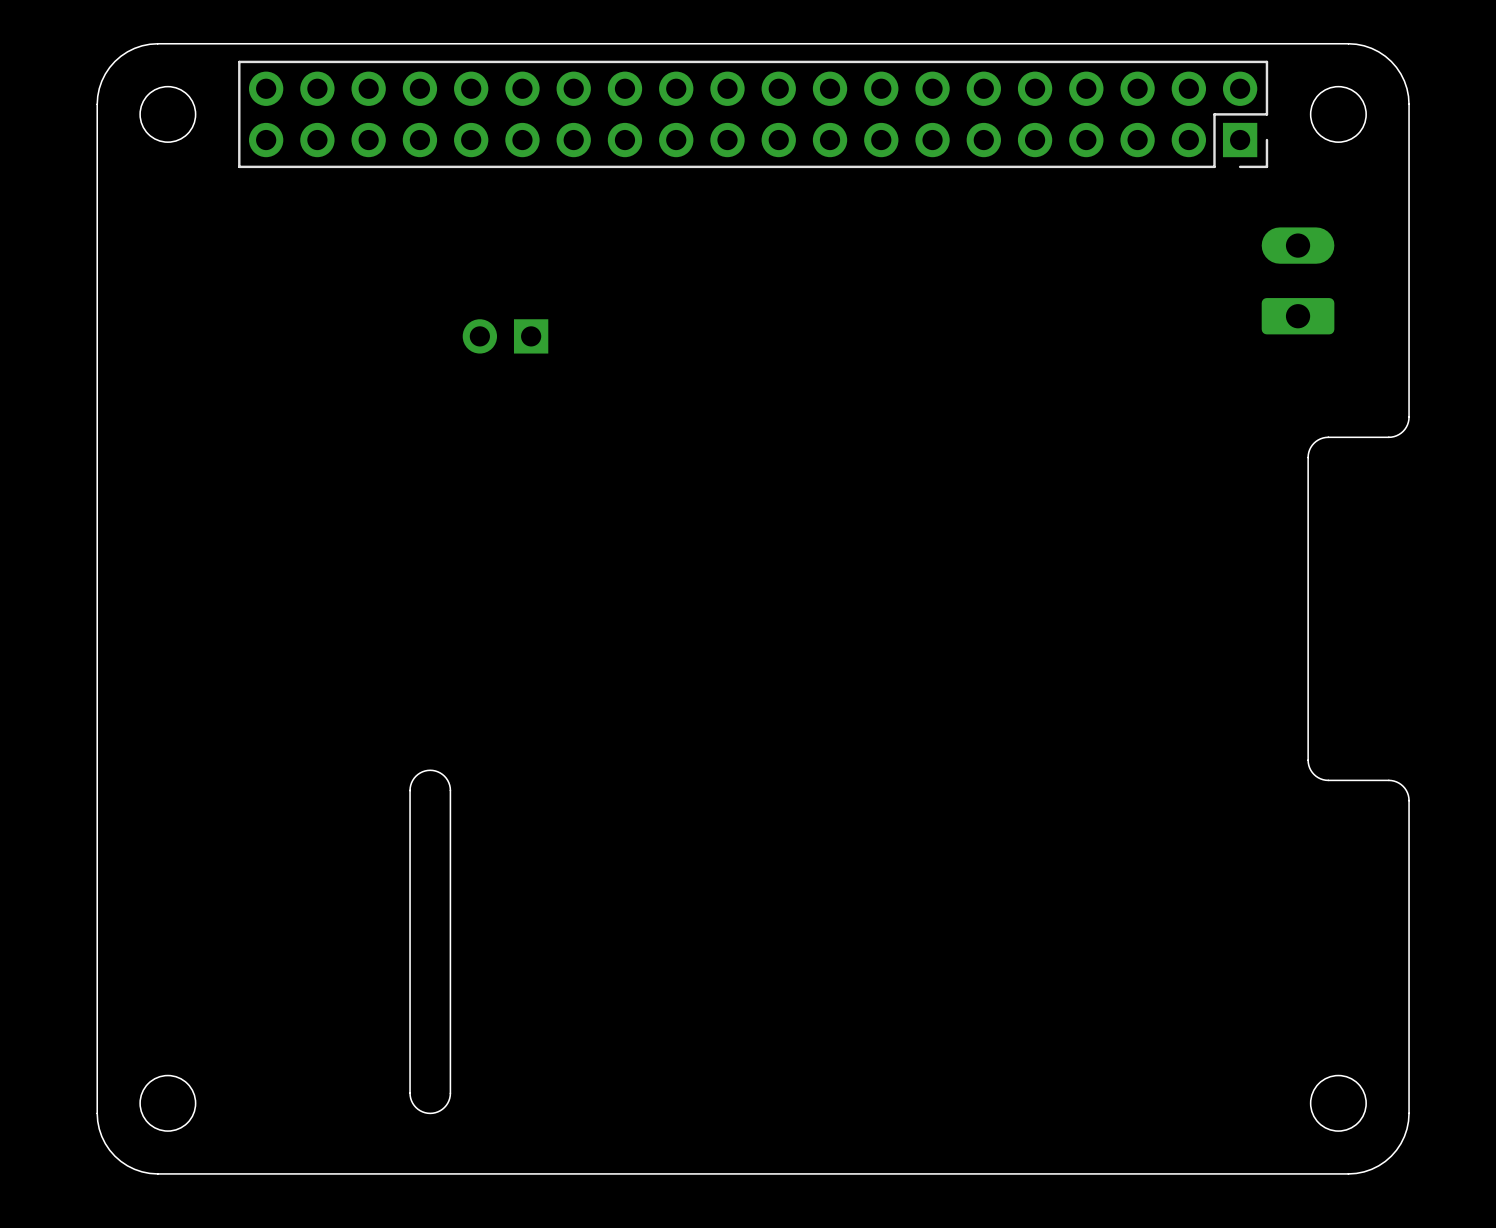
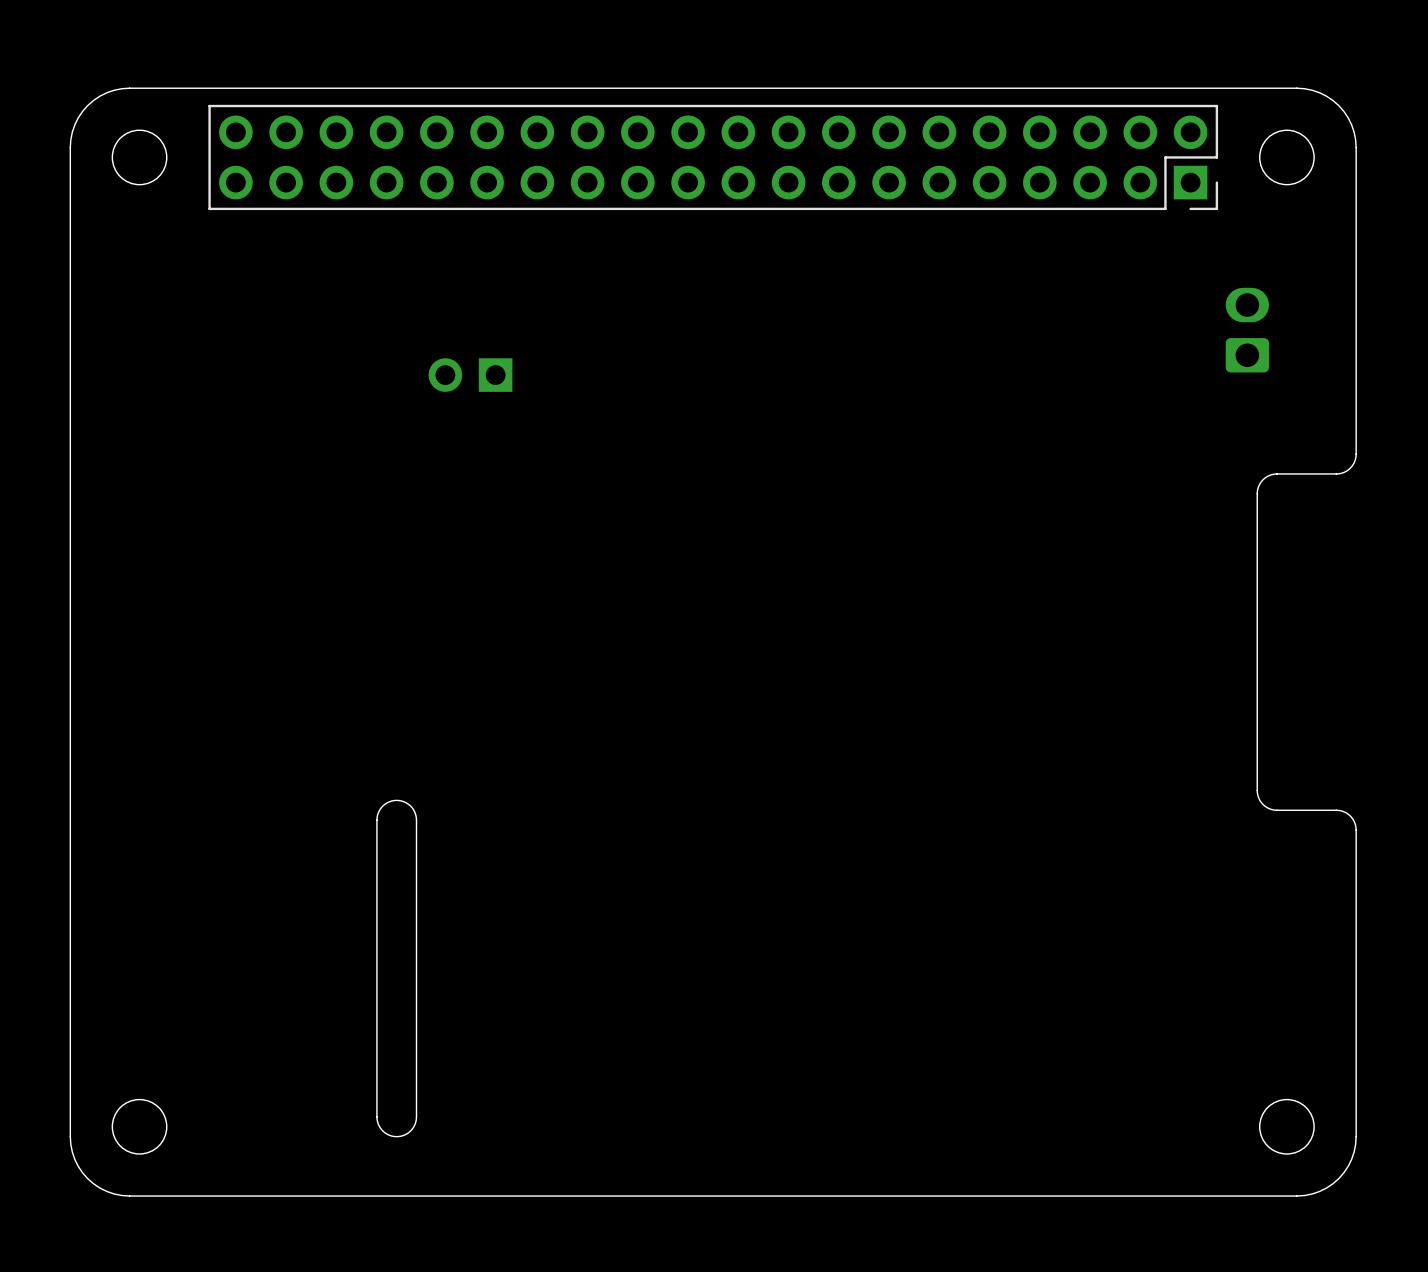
part footprint: [1261, 227, 1335, 335] -> [1225, 287, 1270, 373]

